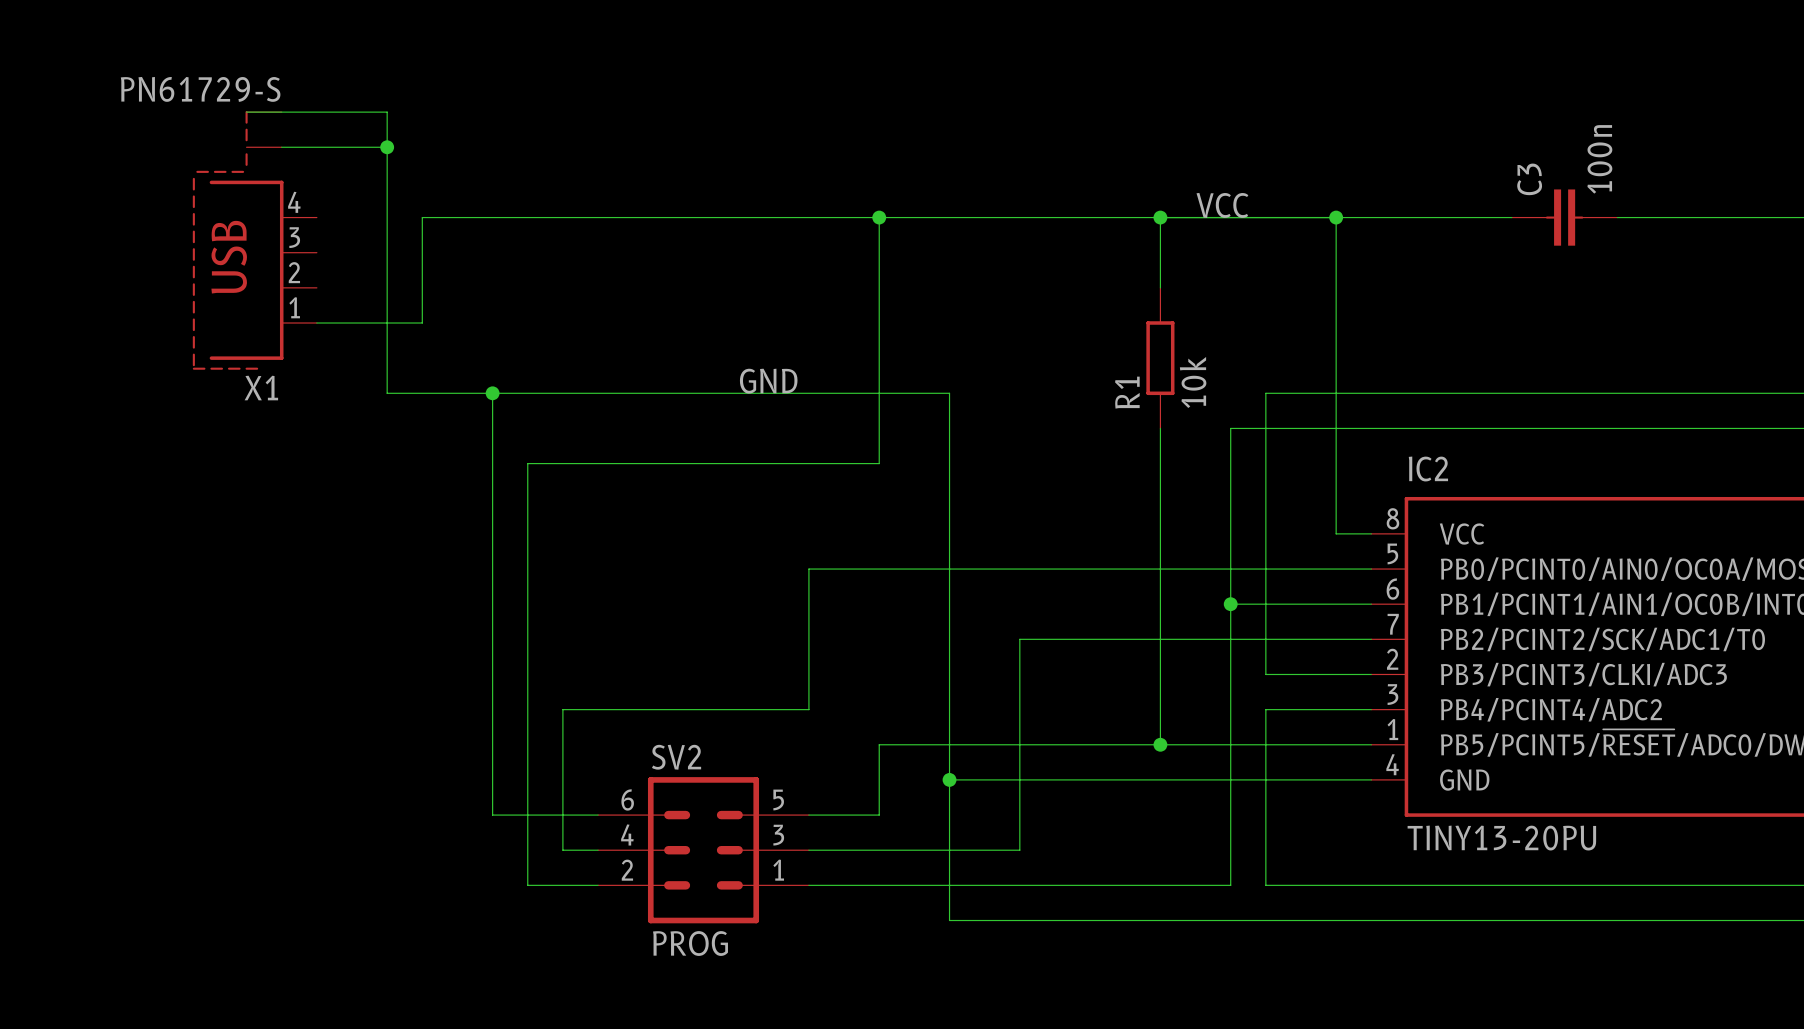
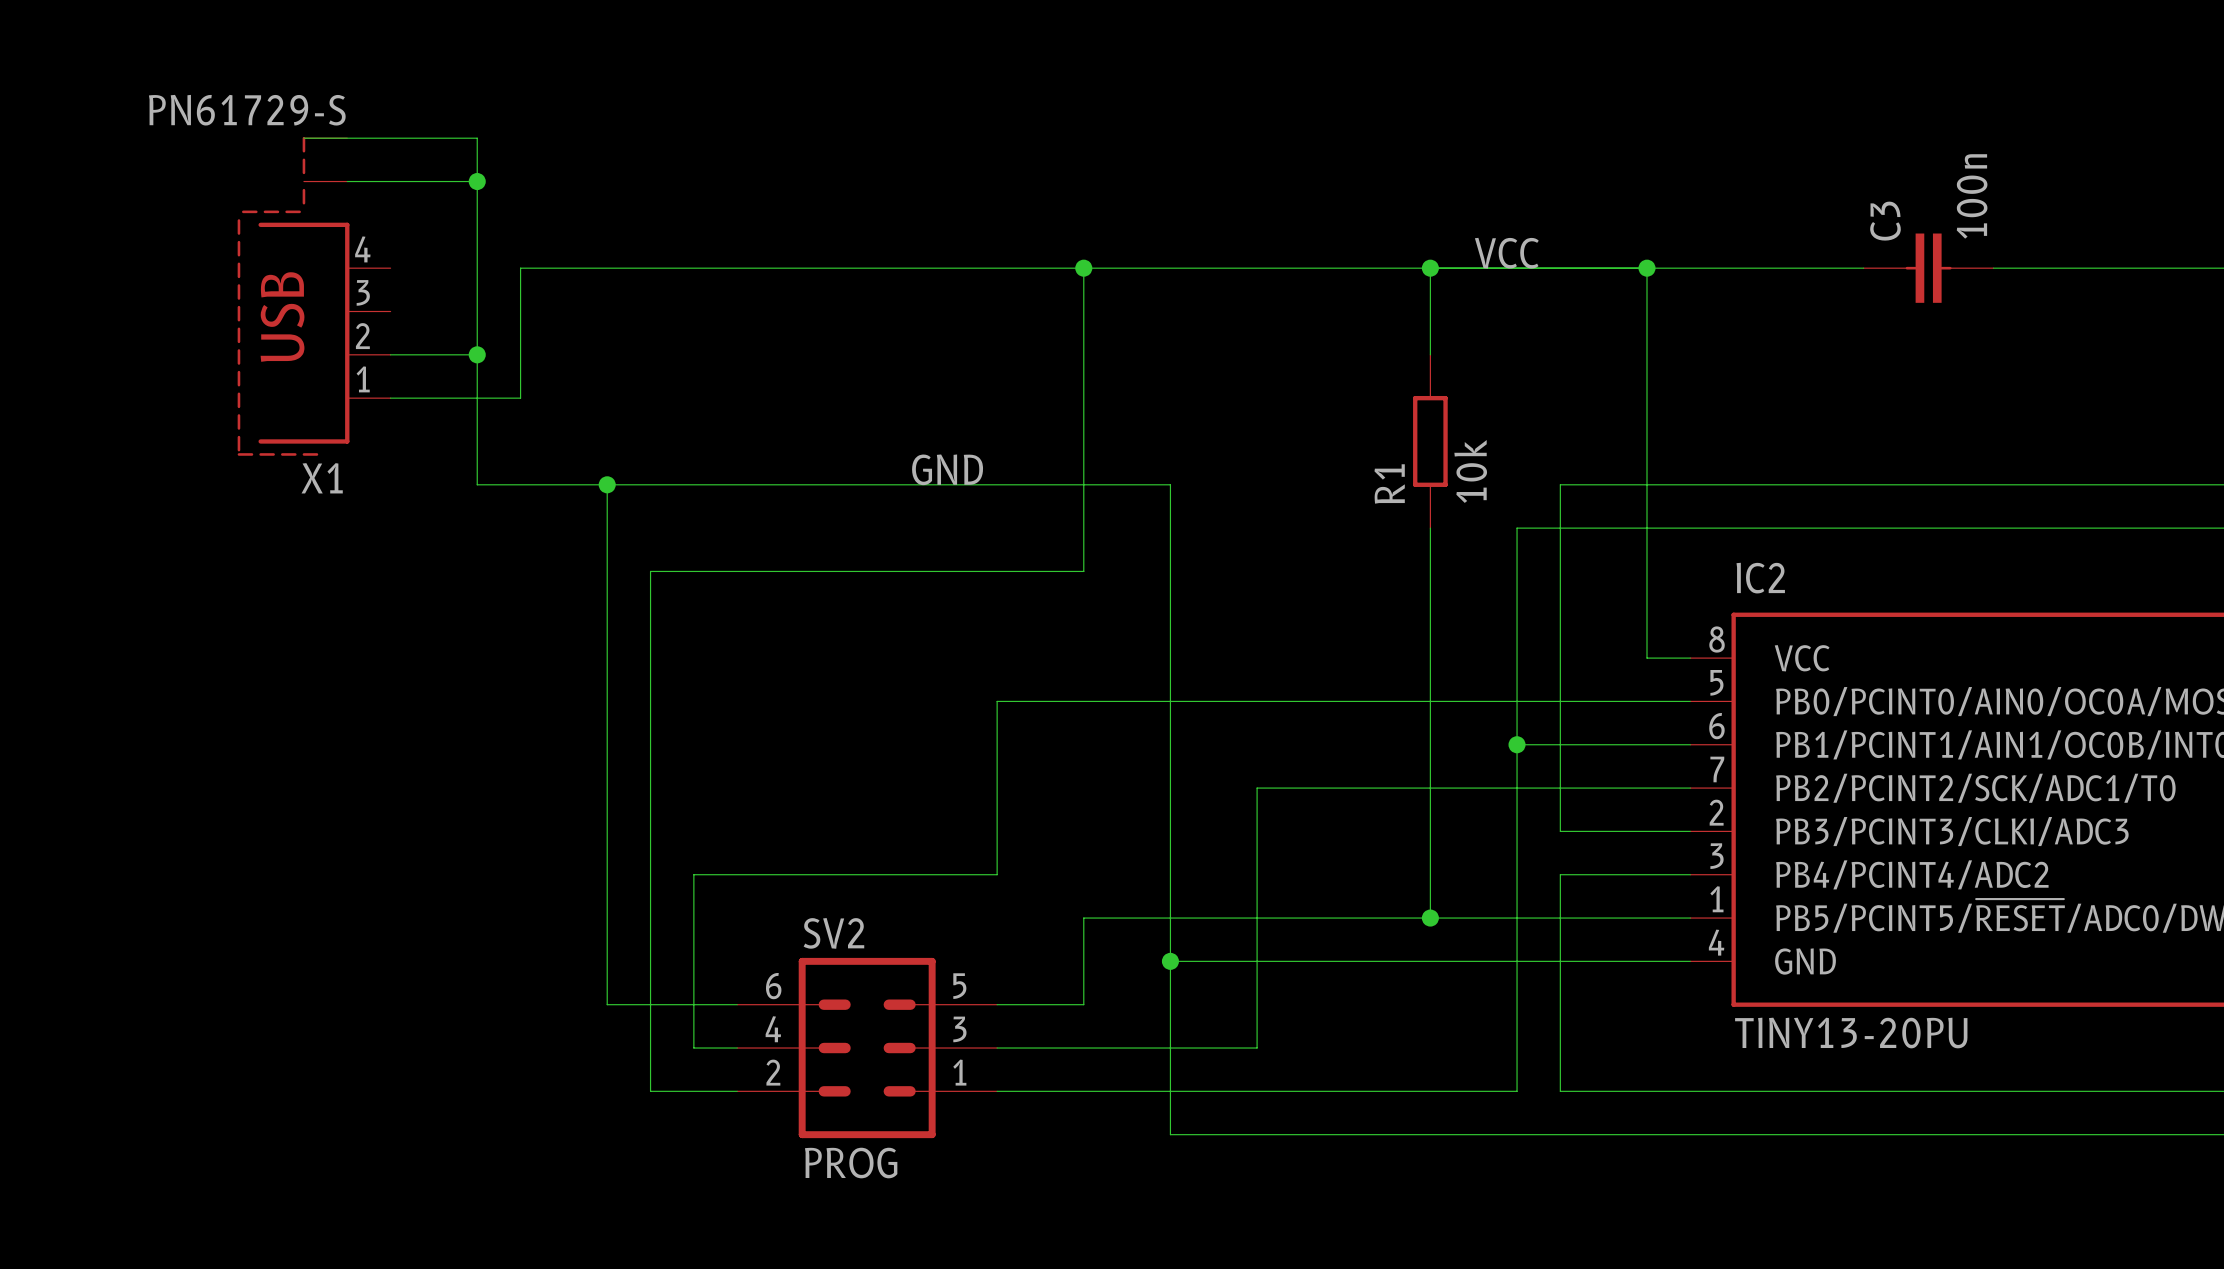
wire: none -> (390, 354) (477, 354)
junction: none -> (477, 354)

